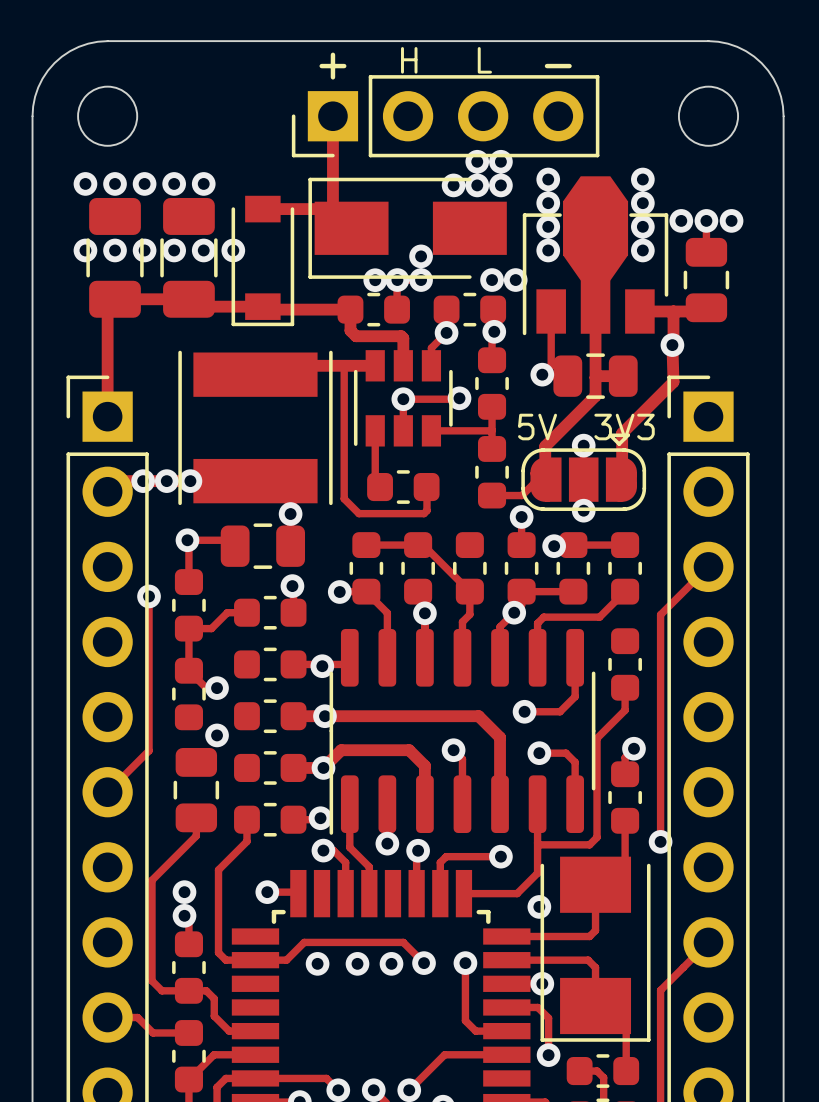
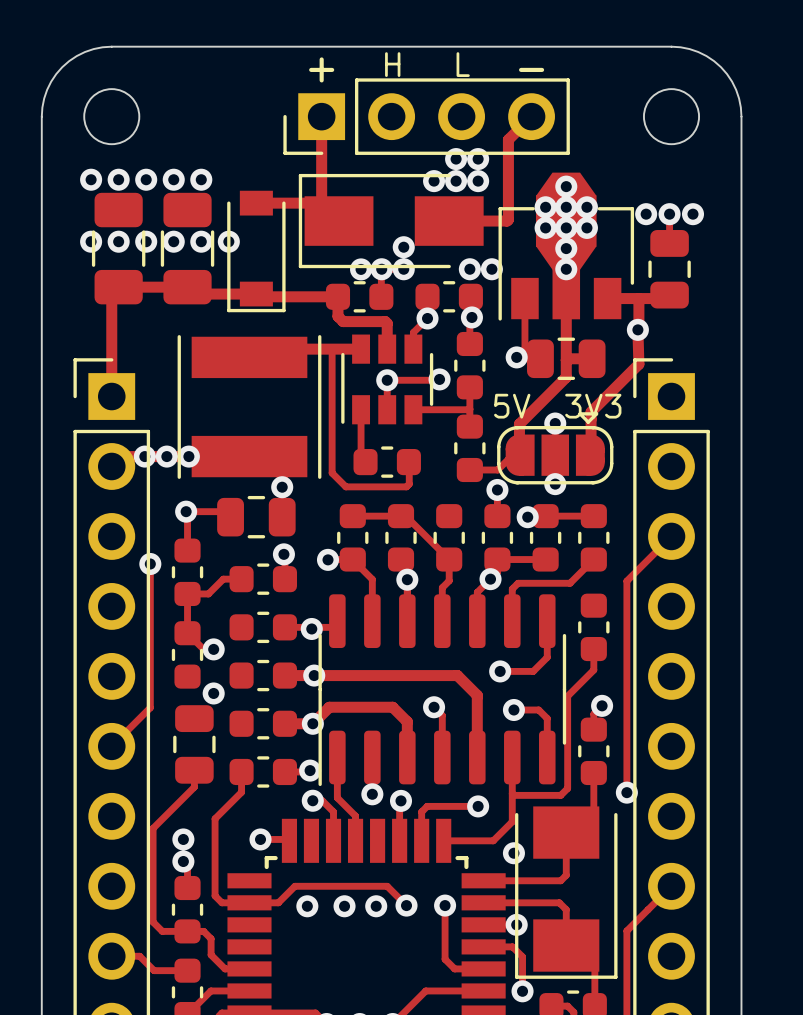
track: none -> (531, 116) (508, 139) (508, 219) (449, 221)
via: (548, 179) -> none
via: (642, 179) -> none
via: none -> (566, 186)
via: (548, 203) -> none
via: (642, 203) -> none
via: none -> (545, 207)
via: none -> (566, 207)
via: none -> (586, 207)
via: (548, 226) -> none
via: (642, 226) -> none
via: none -> (545, 227)
via: none -> (566, 227)
via: none -> (586, 227)
via: (548, 250) -> none
via: (642, 250) -> none
via: none -> (566, 248)
via: none -> (566, 269)

